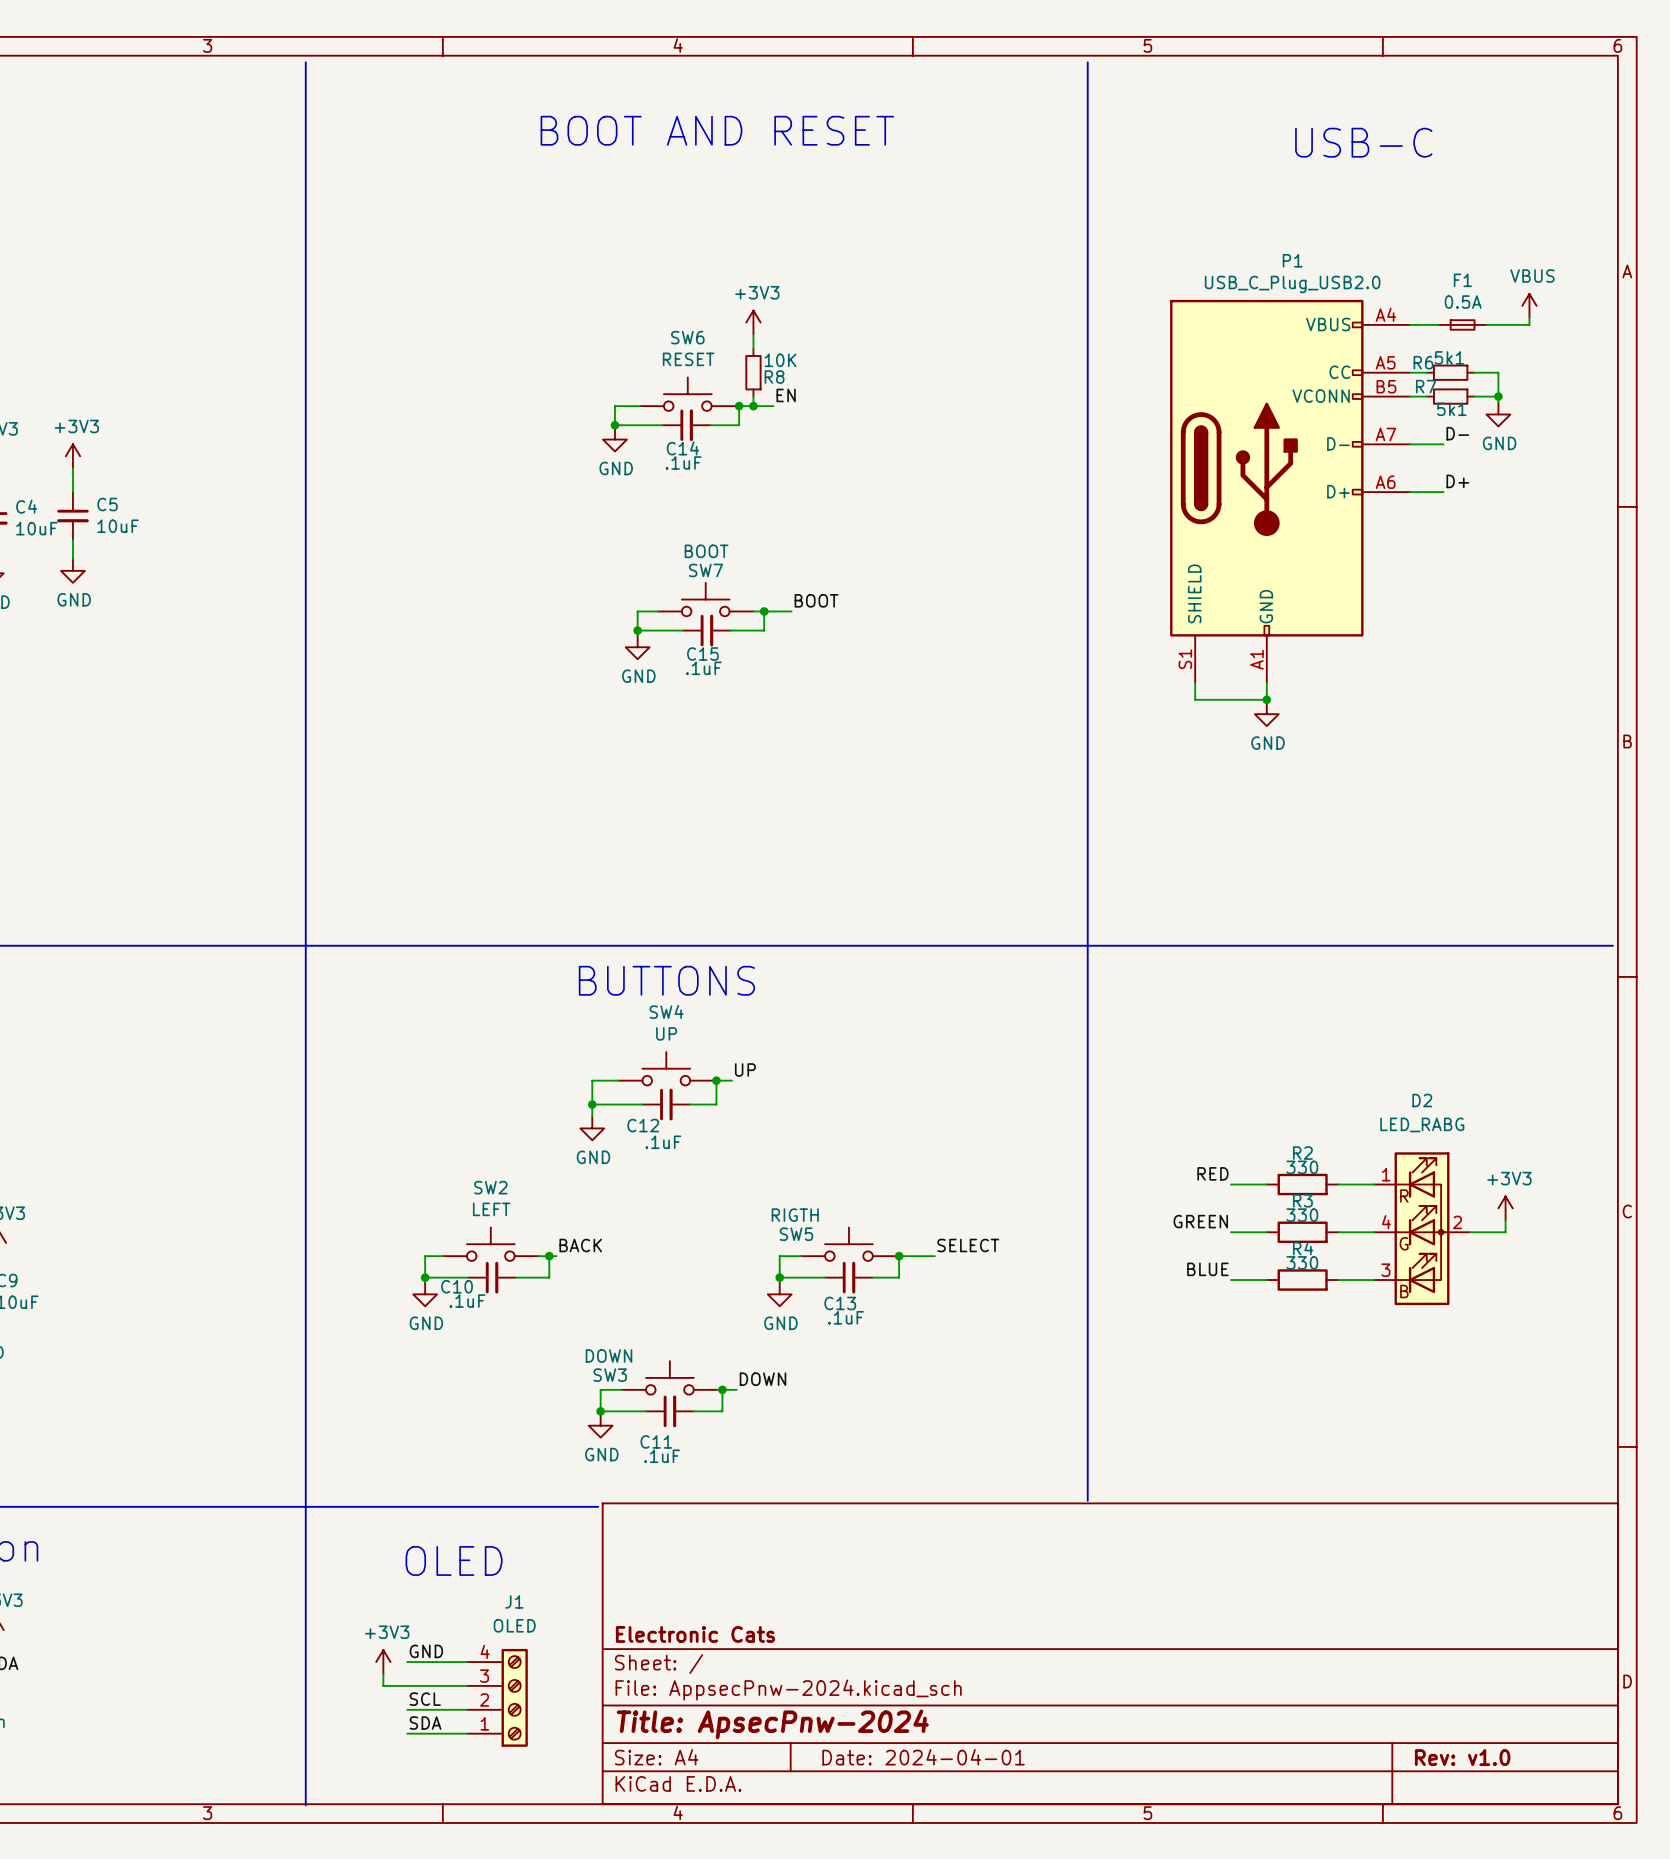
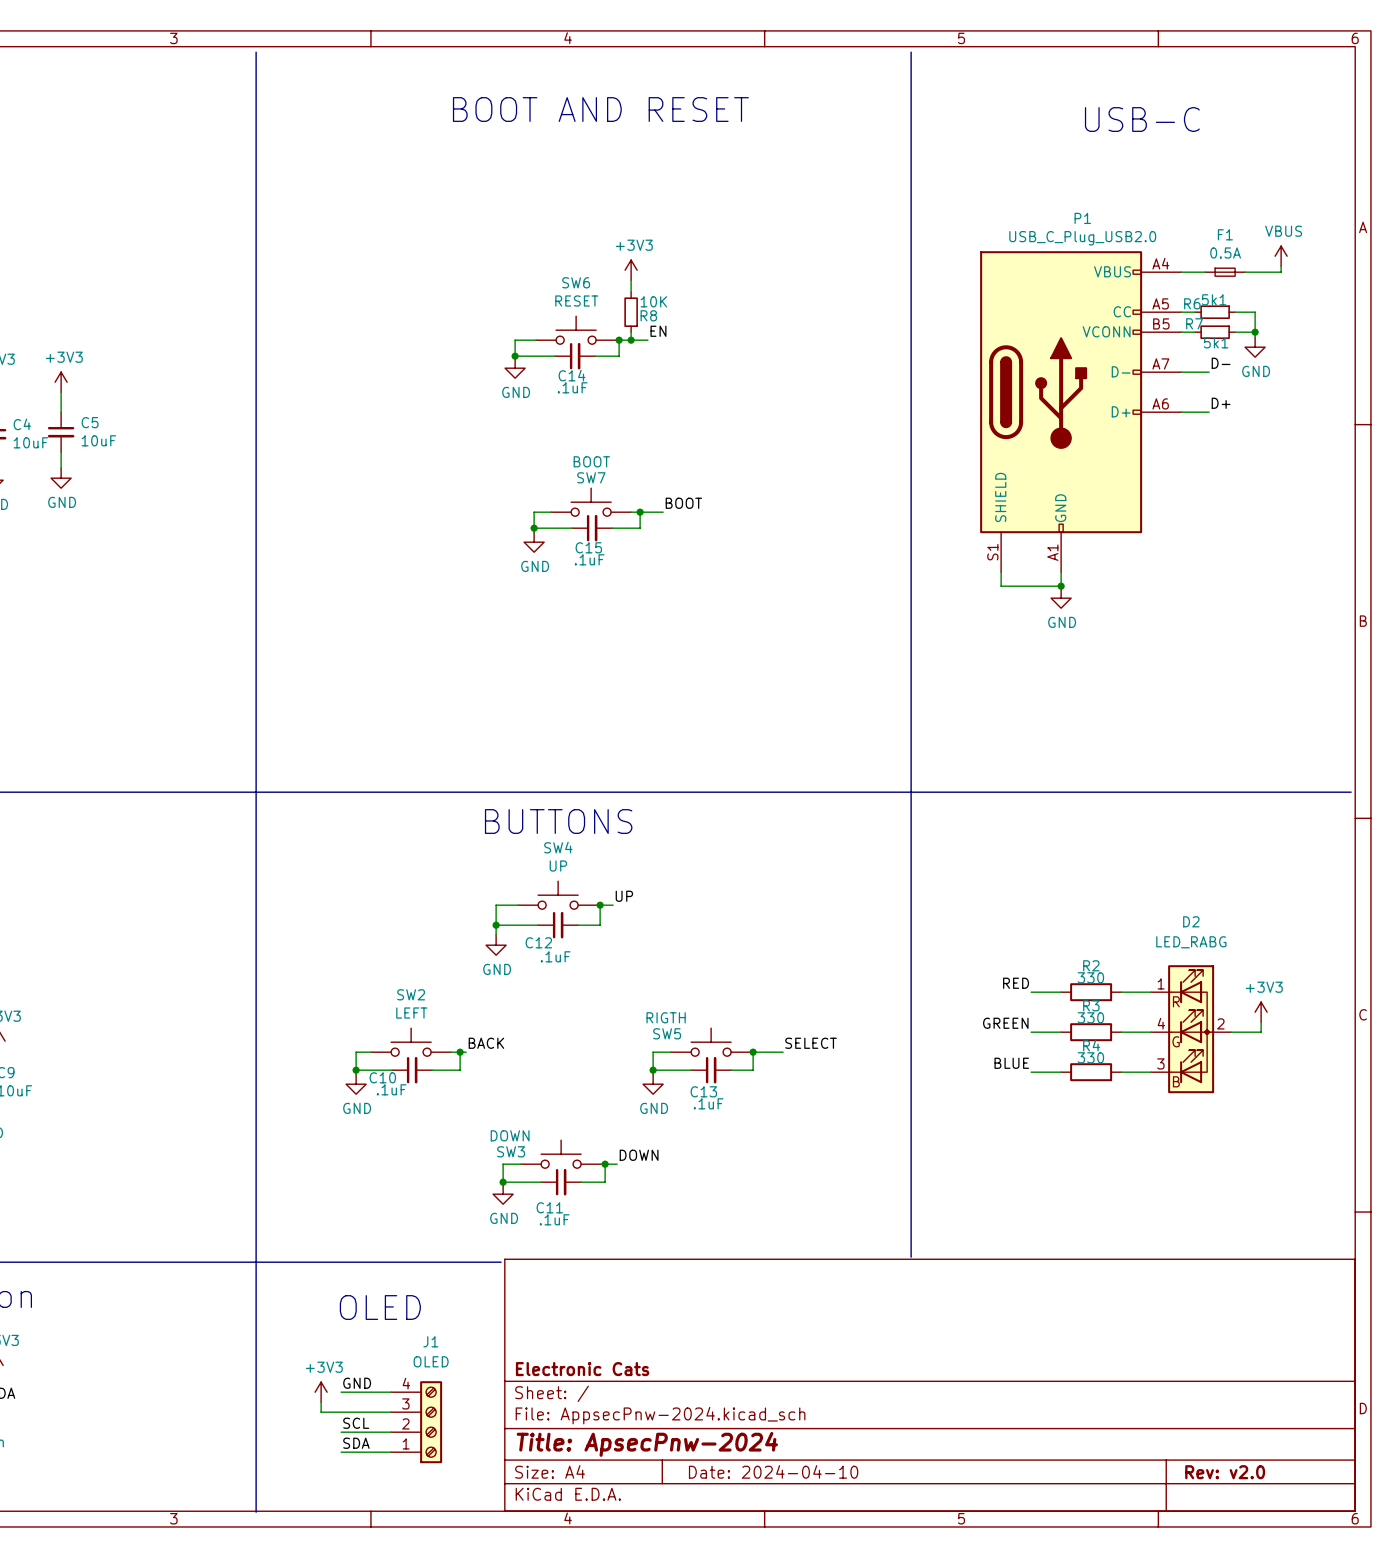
title block: Date: 2024-04-01 (923, 1757) -> Date: 2024-04-10 (773, 1471)
title block: Rev: v1.0 (1462, 1757) -> Rev: v2.0 (1225, 1472)

